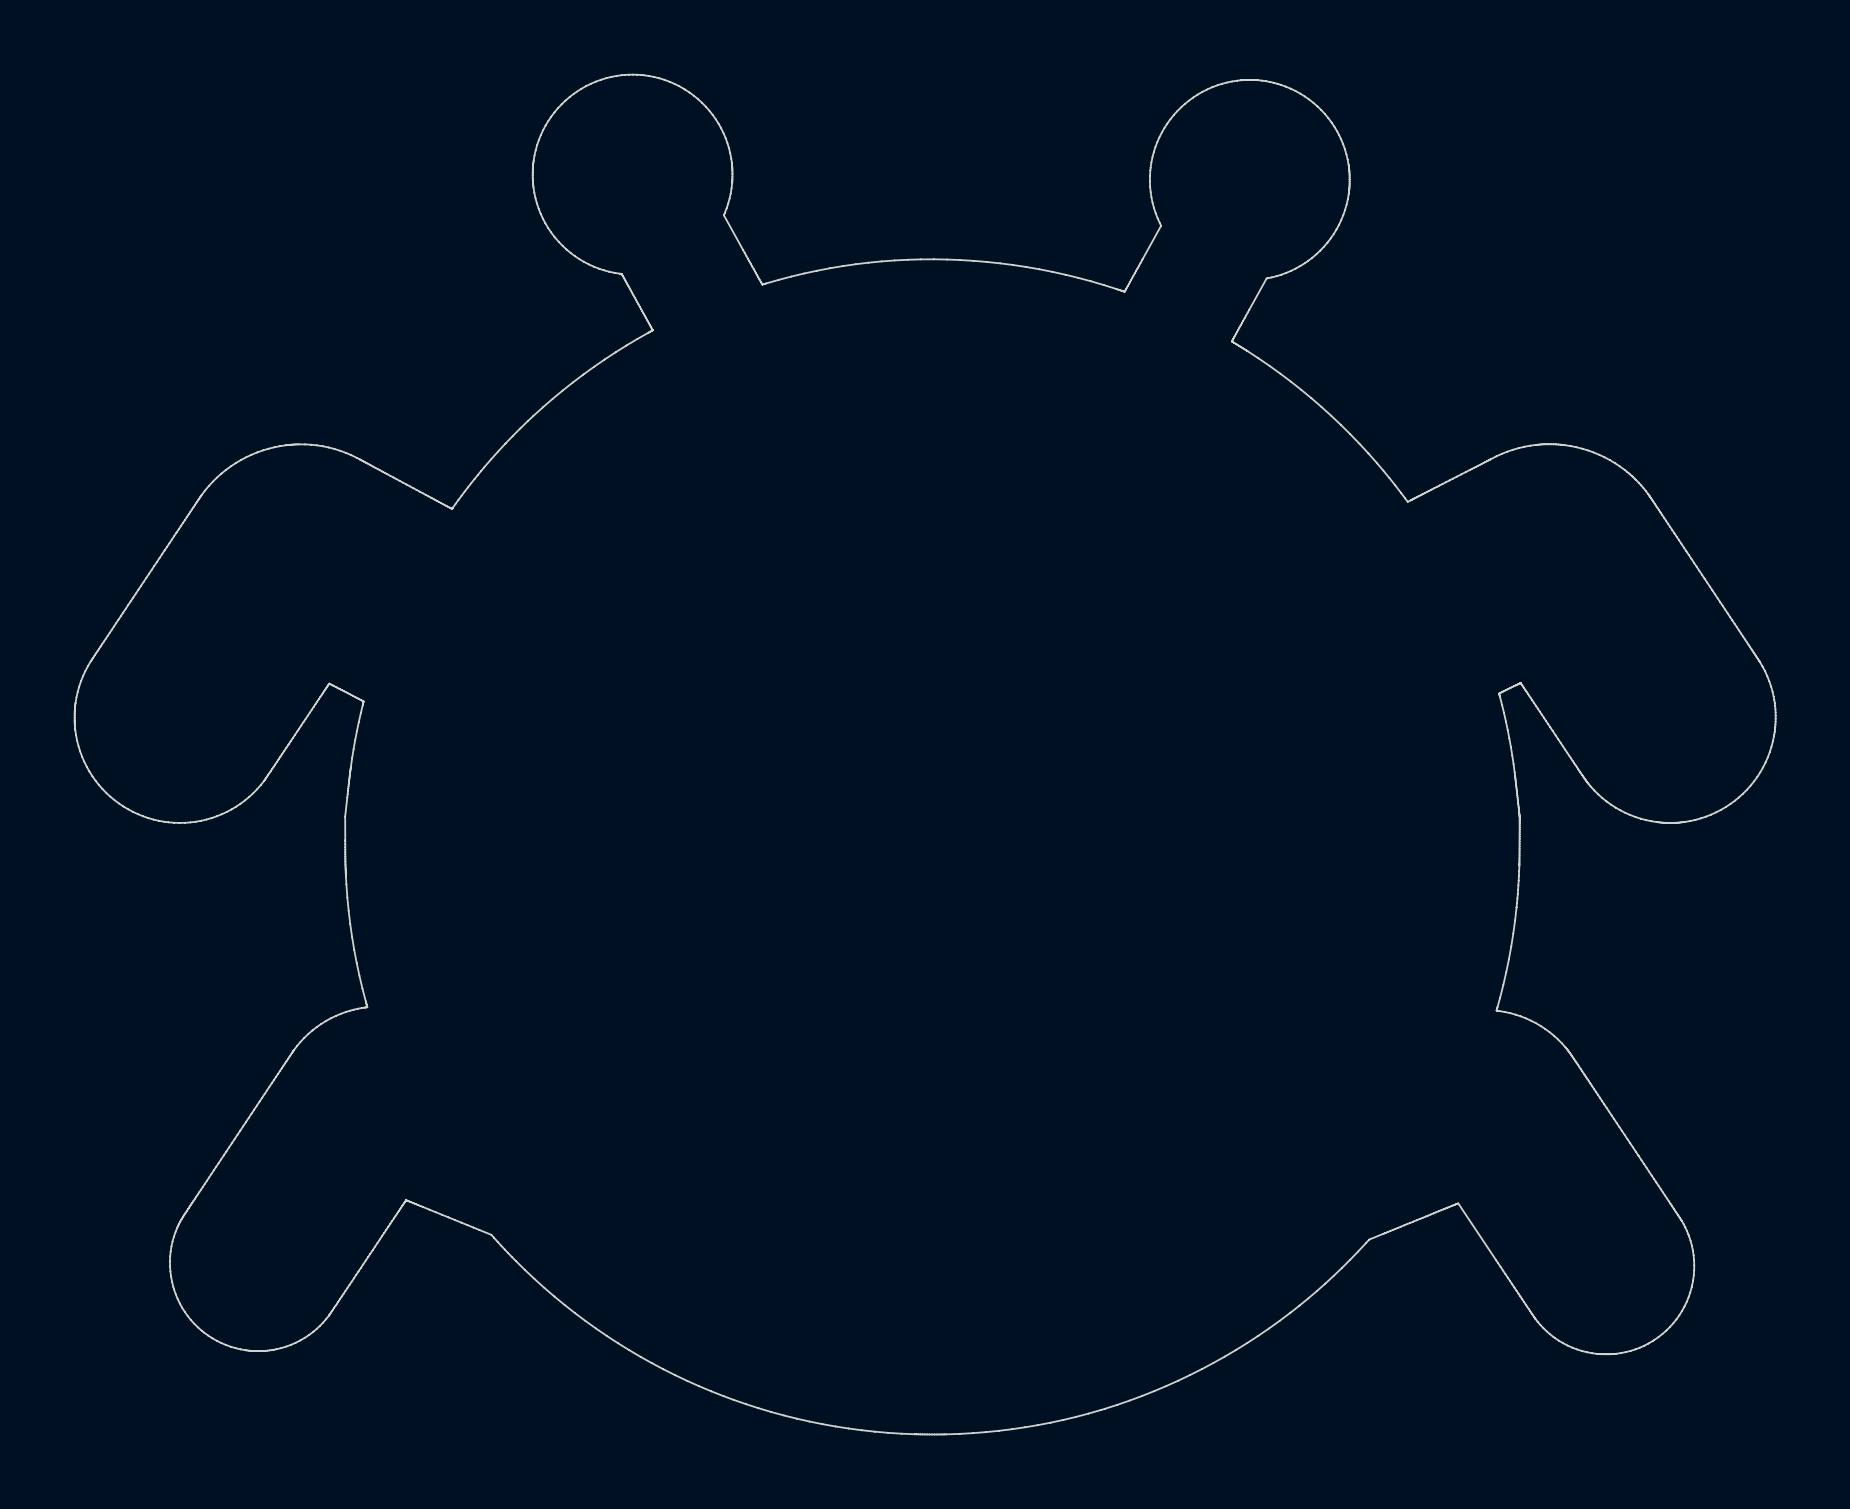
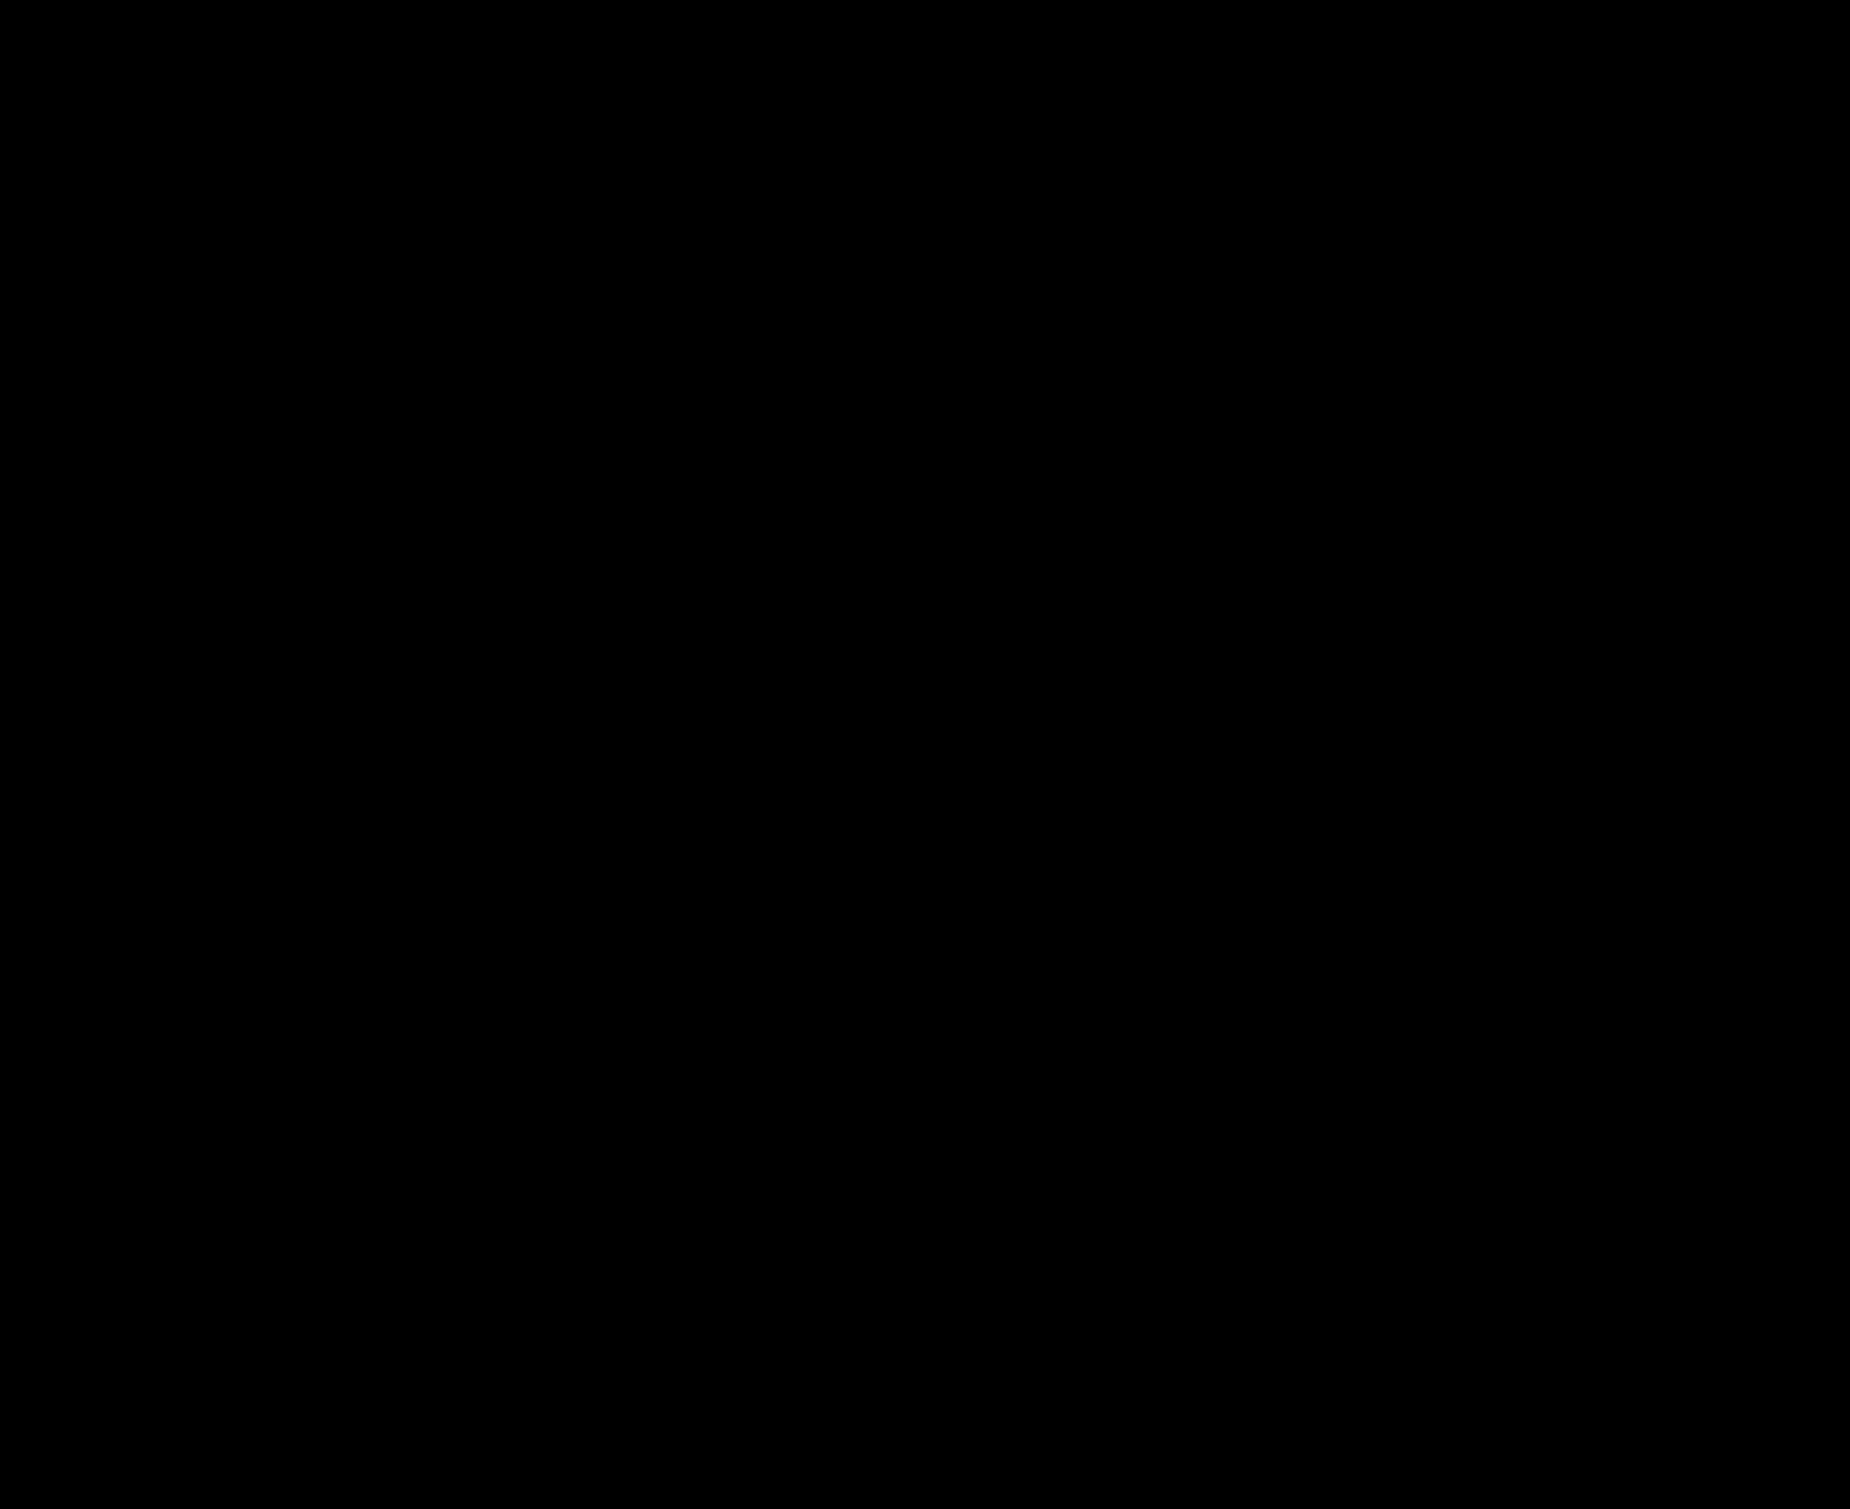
drawing: [73, 73, 1777, 1436] -> none

